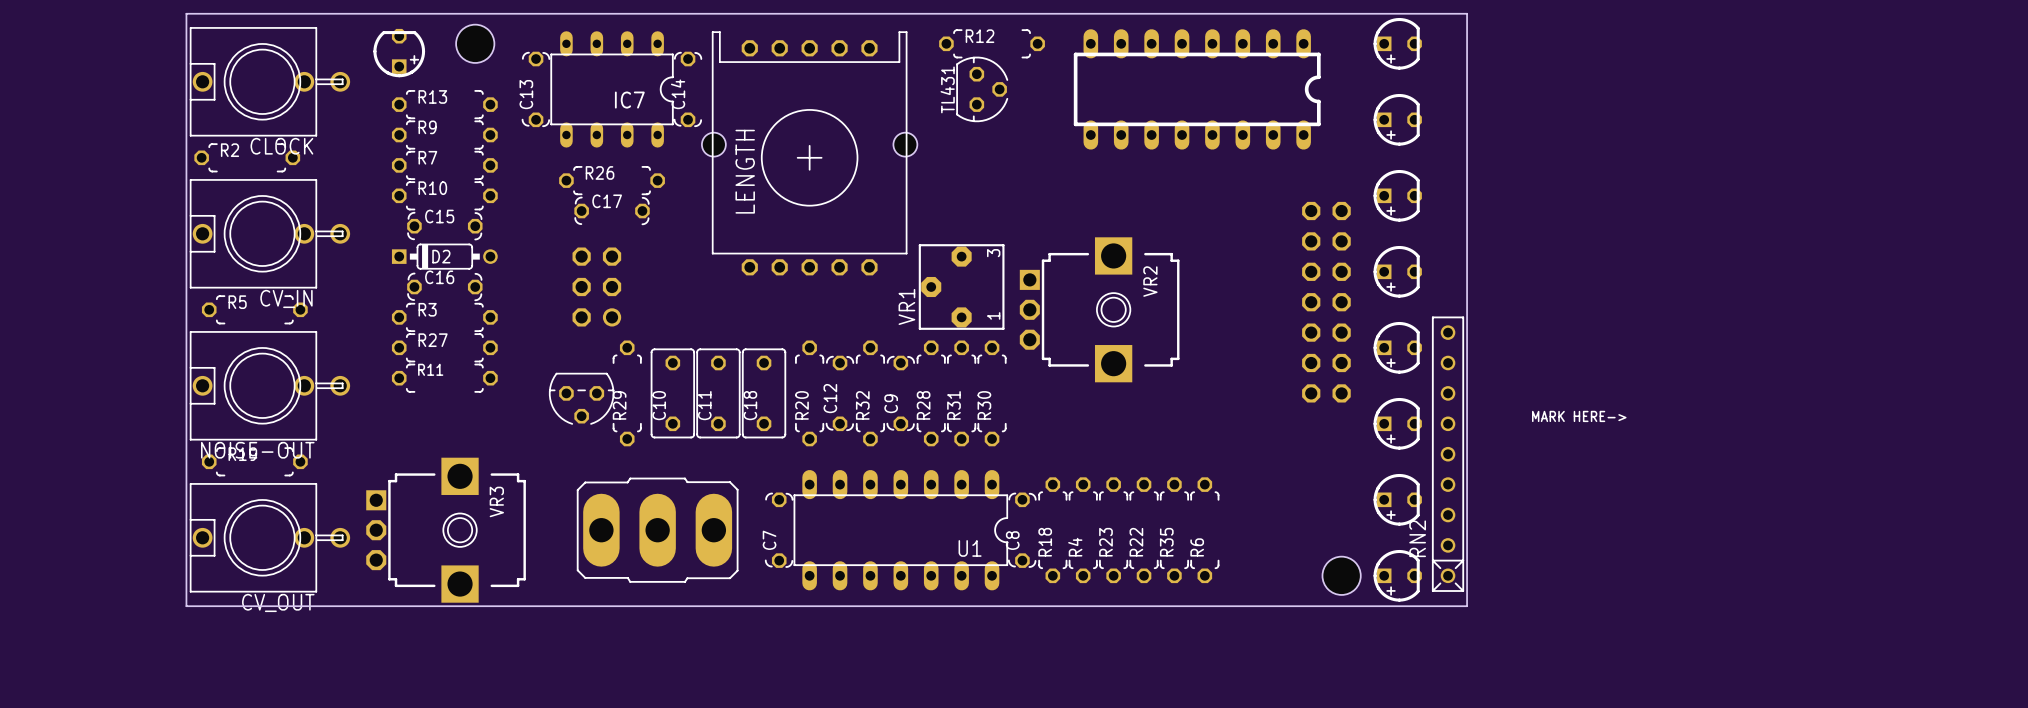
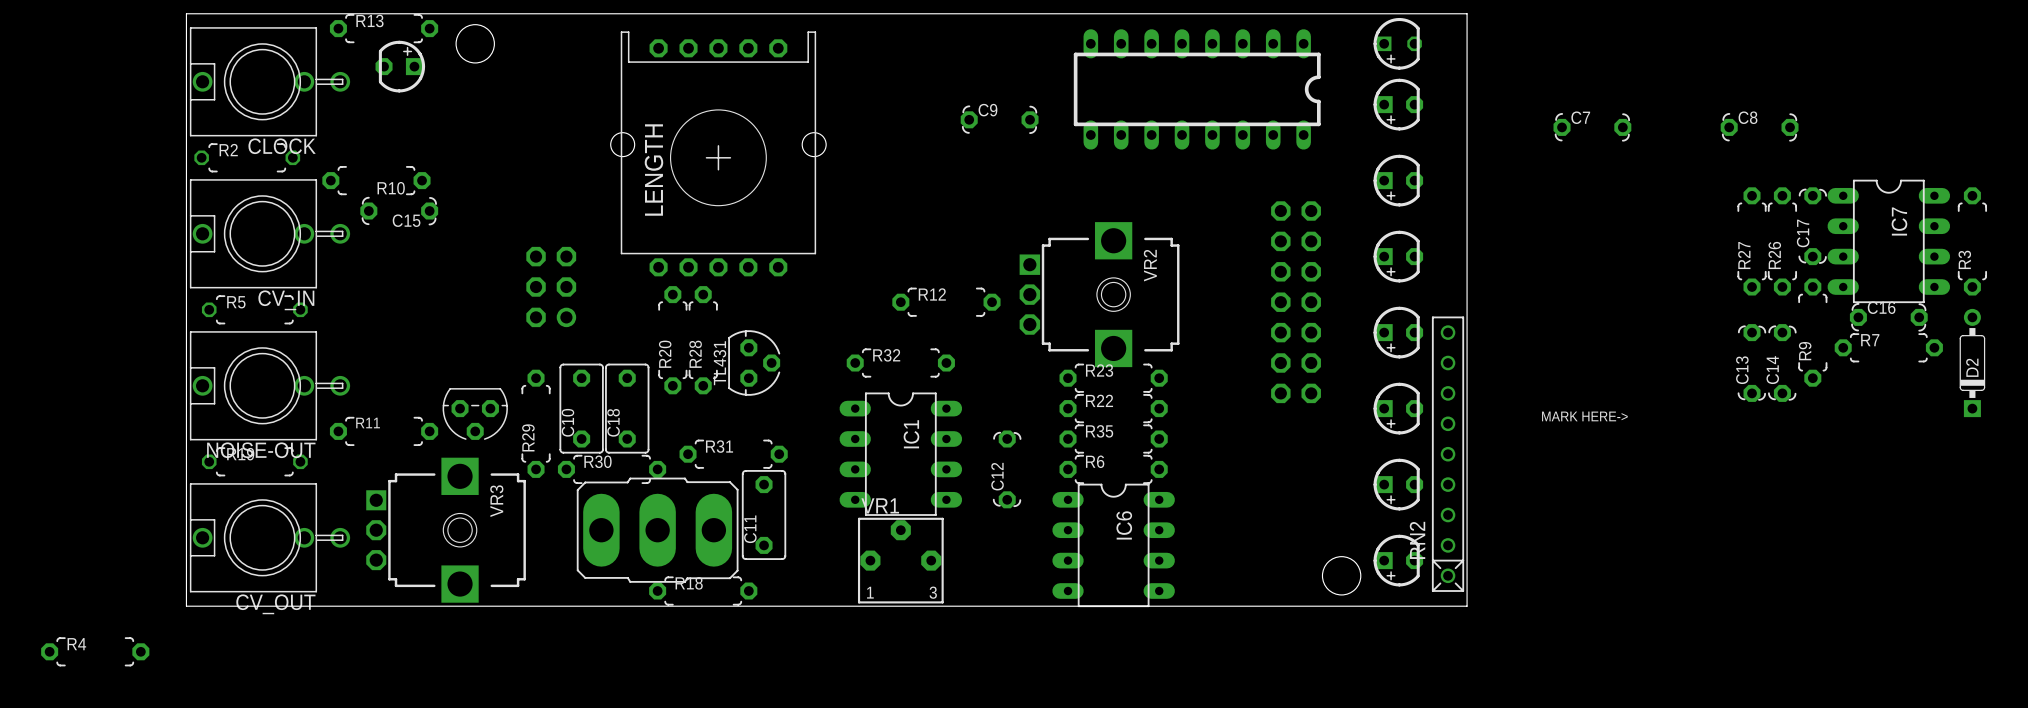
R12 footprint: [939, 29, 1045, 59] -> [892, 287, 1001, 317]
IC7 footprint: [550, 31, 674, 148] -> [1827, 179, 1951, 304]
C13 footprint: [521, 51, 551, 128] -> [1737, 324, 1767, 402]
C14 footprint: [673, 51, 703, 128] -> [1768, 324, 1797, 402]
part: (399, 53) -> none
TL431 footprint: [956, 56, 1009, 123] -> [728, 330, 781, 396]
part: none -> (400, 66)
R13 footprint: [391, 90, 498, 120] -> [329, 14, 439, 44]
part: none -> (1398, 104)
part: (1397, 119) -> none
R9 footprint: [391, 120, 498, 150] -> [1798, 278, 1828, 387]
R7 footprint: [391, 150, 498, 181] -> [1834, 333, 1943, 363]
LENGTH: none -> (718, 153)
LENGTH: (809, 153) -> none
R26 footprint: [559, 166, 665, 196] -> [1767, 187, 1798, 296]
part: none -> (1398, 180)
R10 footprint: [391, 181, 498, 211] -> [322, 166, 431, 196]
R10 name position: R10 (432, 188) -> R10 (391, 188)
part: (1397, 195) -> none
C17 footprint: [574, 196, 650, 226] -> [1798, 187, 1828, 266]
C15 footprint: [407, 211, 483, 241] -> [360, 196, 439, 226]
VR2 footprint: [1019, 237, 1180, 383] -> [1019, 222, 1180, 368]
D2 footprint: [391, 243, 498, 270] -> [1959, 308, 1986, 418]
part: none -> (1398, 256)
part: (1397, 271) -> none
C16 footprint: [407, 272, 483, 302] -> [1849, 303, 1928, 332]
part: none -> (551, 287)
part: (596, 287) -> none
VR1 rotation: 0° (961, 287) -> 90° clockwise (900, 560)
VR1 position: (961, 287) -> (900, 560)
R3 footprint: [391, 302, 498, 332] -> [1957, 187, 1988, 296]
part: none -> (1296, 302)
part: (1326, 302) -> none
part: none -> (1398, 332)
R27 footprint: [391, 333, 498, 363] -> [1737, 187, 1767, 296]
R29 footprint: [612, 340, 642, 447] -> [521, 369, 551, 478]
R20 footprint: [795, 340, 825, 447] -> [658, 286, 688, 395]
R32 footprint: [855, 340, 886, 447] -> [846, 348, 955, 378]
R28 footprint: [916, 340, 946, 447] -> [688, 286, 718, 395]
R31 footprint: [947, 340, 977, 447] -> [679, 439, 788, 469]
R30 footprint: [977, 340, 1007, 447] -> [557, 454, 667, 484]
part: (1397, 347) -> none
C10 footprint: [650, 348, 696, 439] -> [559, 363, 604, 454]
C11 footprint: [696, 348, 741, 439] -> [741, 470, 787, 560]
C18 footprint: [741, 348, 787, 439] -> [605, 363, 650, 454]
C12 footprint: [825, 355, 855, 432] -> [992, 430, 1022, 509]
C9 footprint: [886, 355, 916, 432] -> [960, 105, 1039, 134]
R11 footprint: [391, 363, 498, 393] -> [329, 416, 439, 446]
part: (581, 398) -> none
part: none -> (1398, 408)
part: none -> (475, 414)
part: (1397, 423) -> none
IC1: none -> (900, 454)
R18 footprint: [1038, 477, 1068, 584] -> [649, 576, 758, 606]
R4 footprint: [1068, 477, 1098, 584] -> [41, 637, 150, 667]
R23 footprint: [1099, 477, 1129, 584] -> [1059, 363, 1168, 393]
R22 footprint: [1129, 477, 1159, 584] -> [1059, 394, 1168, 424]
R35 footprint: [1159, 477, 1190, 584] -> [1059, 424, 1168, 454]
R6 footprint: [1190, 477, 1220, 584] -> [1059, 454, 1168, 484]
part: none -> (1398, 484)
C7 footprint: [764, 492, 794, 568] -> [1553, 113, 1632, 142]
C8 footprint: [1008, 492, 1037, 568] -> [1720, 113, 1799, 142]
part: (1397, 499) -> none
U1: (900, 530) -> none
IC6: none -> (1113, 545)
part: none -> (1398, 560)
part: (1397, 575) -> none

